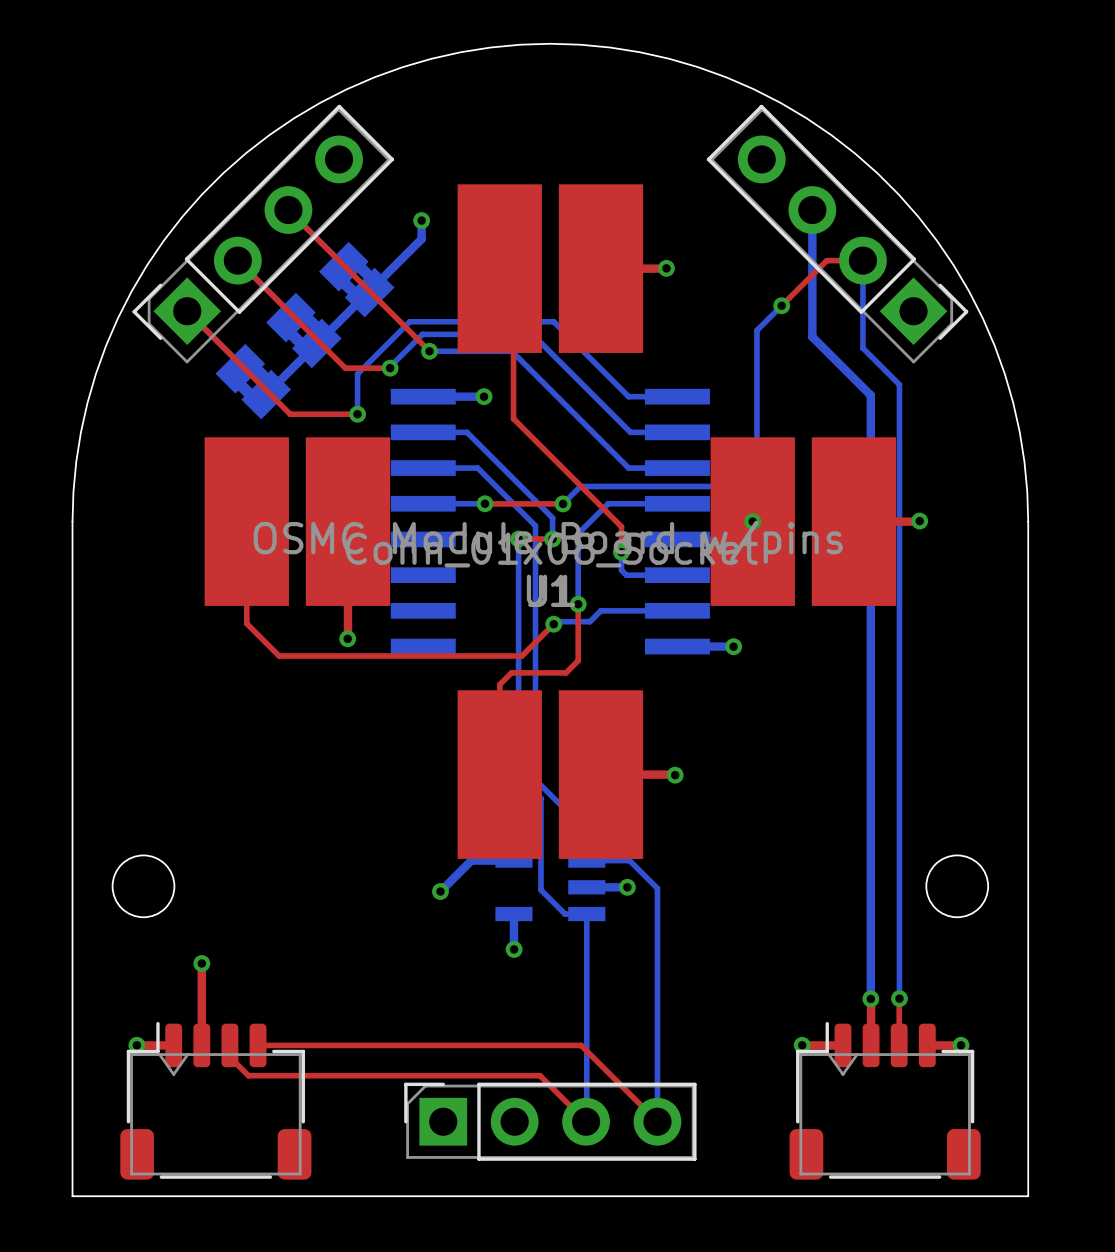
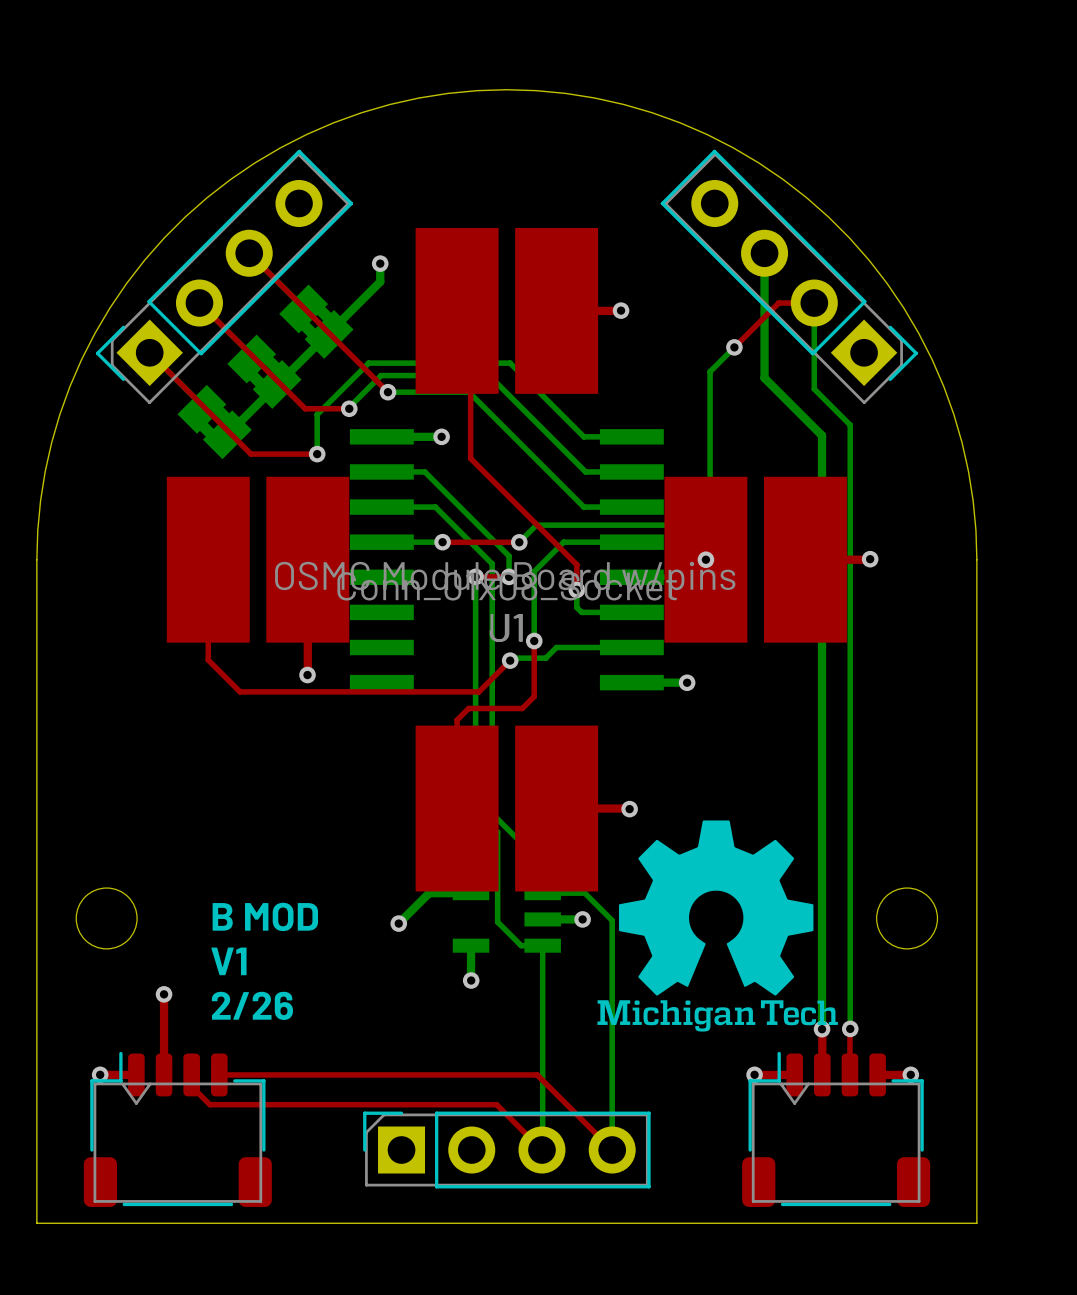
drawing: none -> [597, 820, 838, 1032]
text: none -> B MOD (265, 916)
text: none -> V1 (228, 961)
text: none -> 2/26 (252, 1005)

